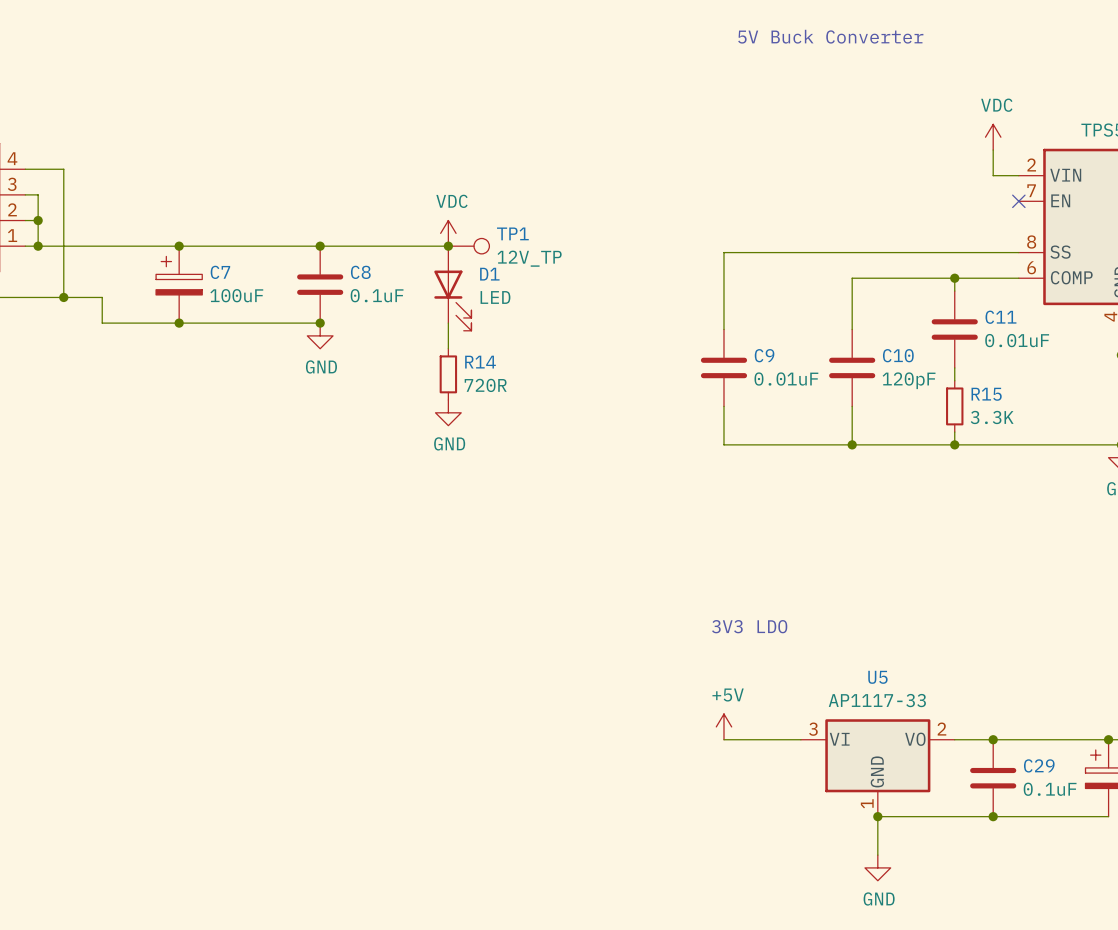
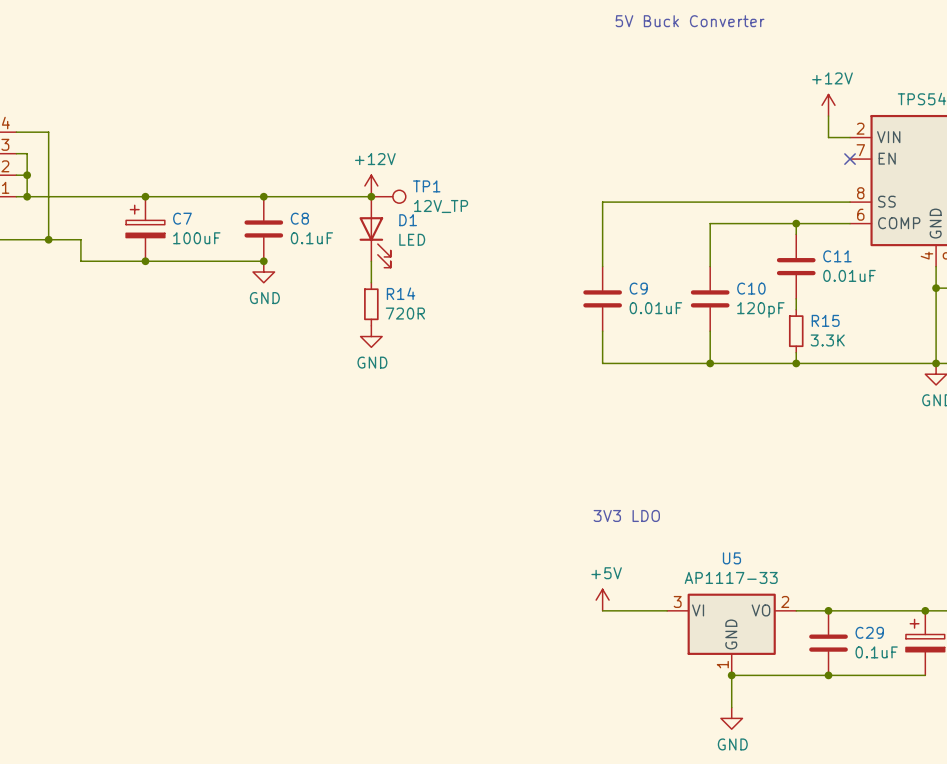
power symbol: VDC (993, 137) -> +12V (828, 105)
power symbol: VDC (448, 233) -> +12V (371, 185)

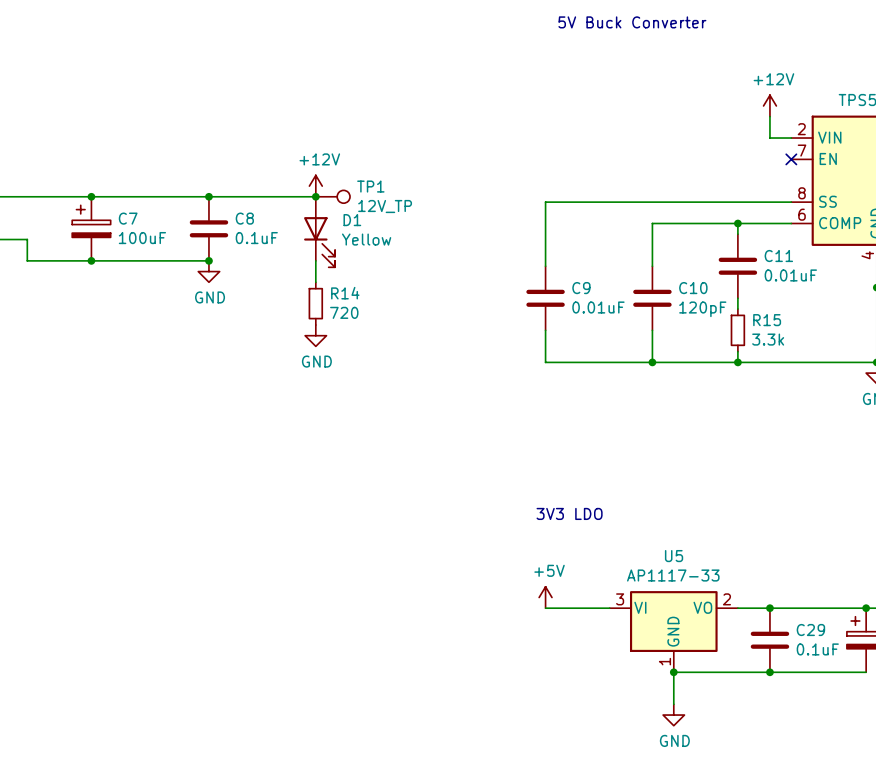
D1 value: LED (412, 239) -> Yellow (366, 239)
R14 value: 720R (405, 313) -> 720 (344, 312)
R15 value: 3.3K (827, 340) -> 3.3k (768, 339)

